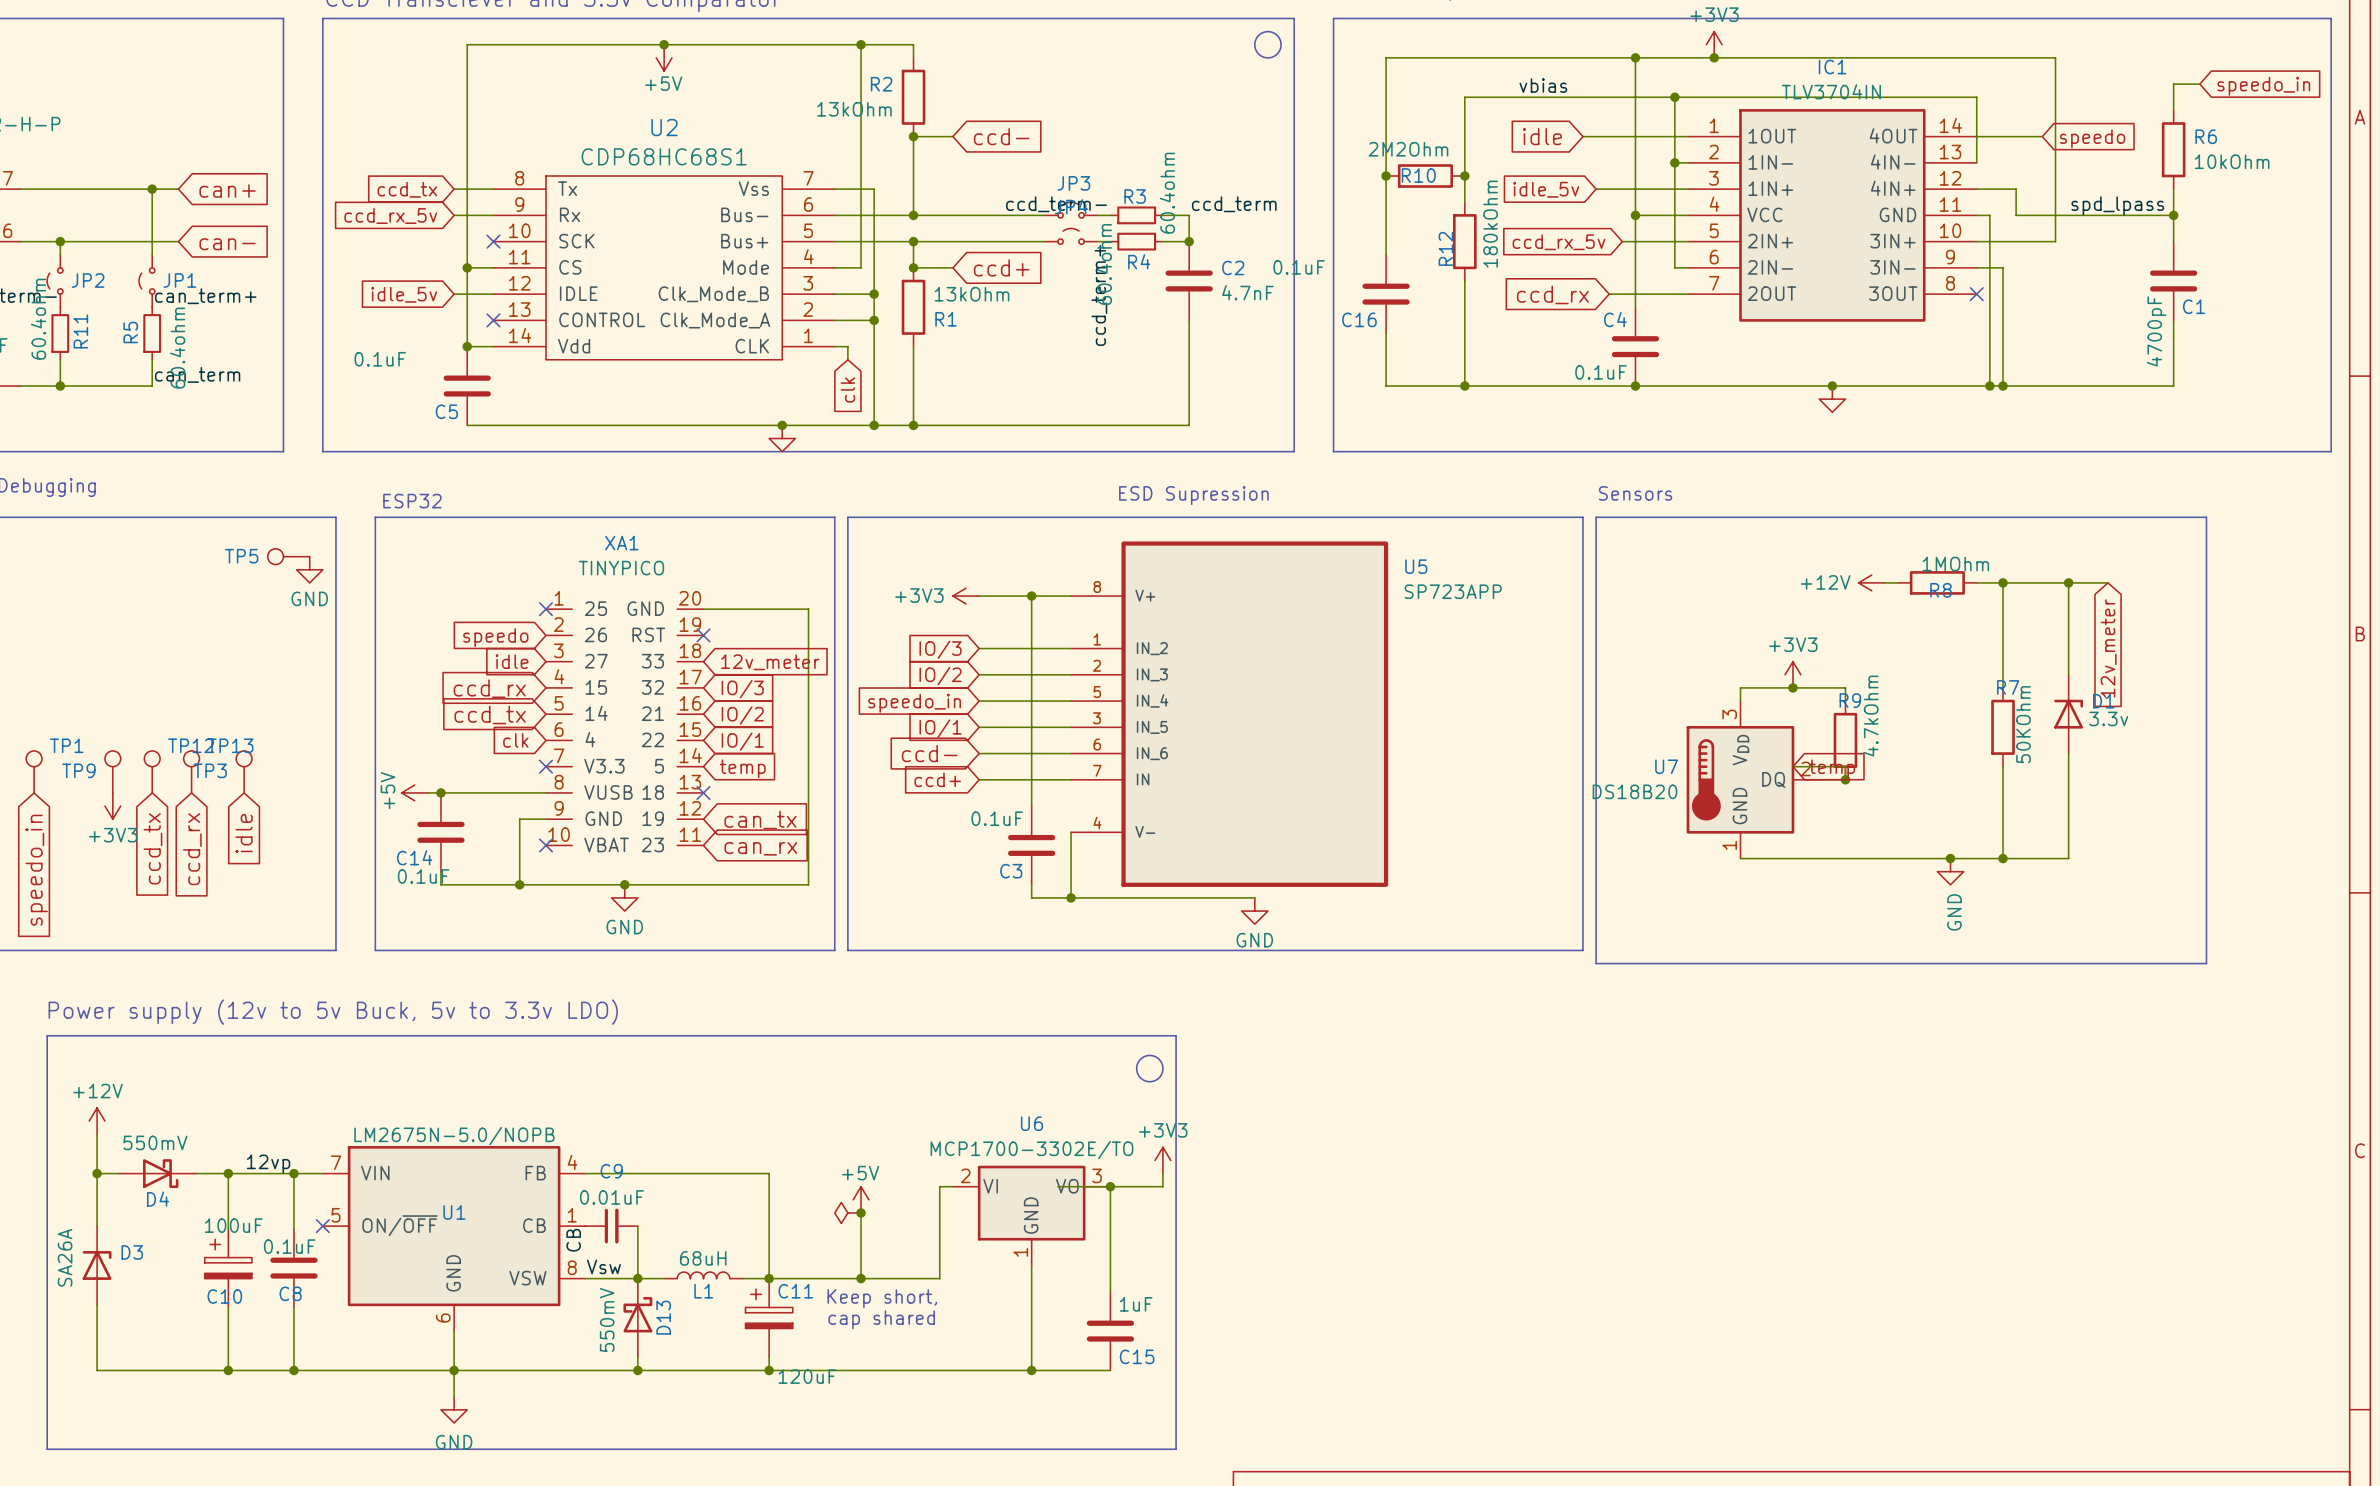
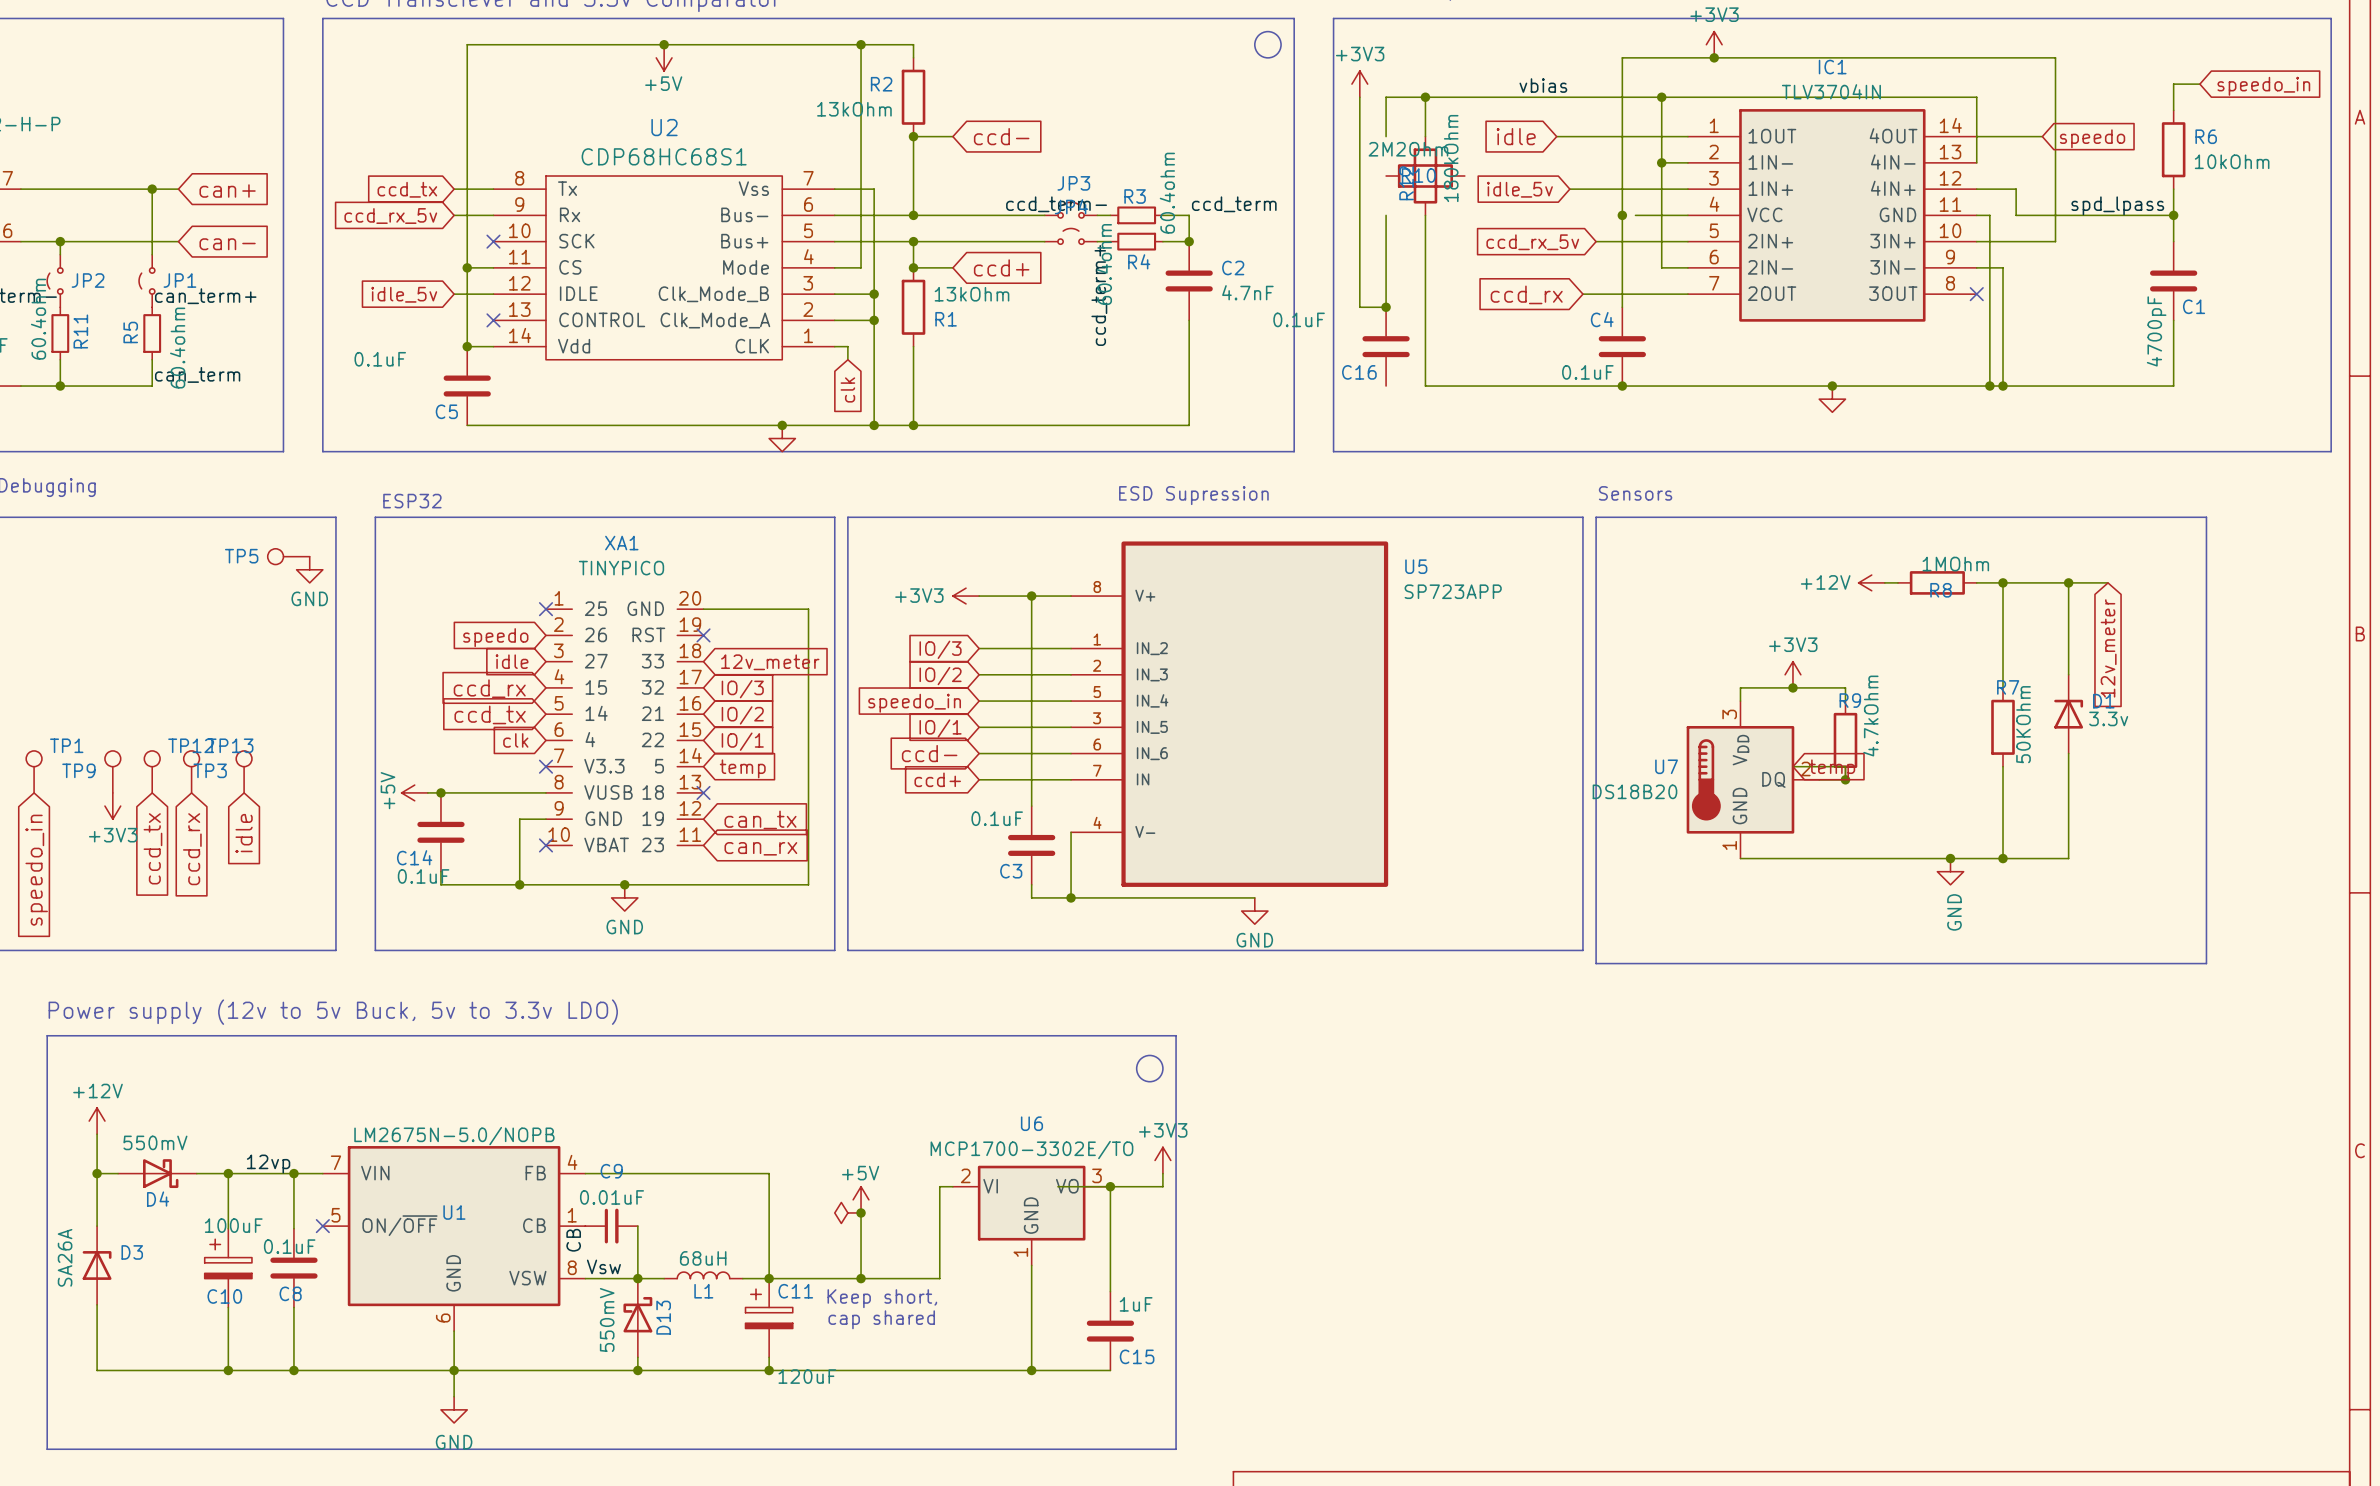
wire: (1622, 57) (1386, 57) (1386, 97) -> (1622, 57) (1622, 307)
wire: (1635, 57) (1635, 307) -> none
junction: (1635, 57) -> none
power symbol: none -> +3V3 (1359, 84)
wire: none -> (1359, 97) (1359, 307) (1386, 307) (1386, 254)
wire: none -> (1425, 97) (1425, 136)
junction: none -> (1425, 97)
wire: (1464, 97) (1464, 202) -> (1464, 97) (1386, 97)
wire: (1674, 97) (1674, 267) -> (1661, 97) (1661, 267) (1674, 267)
junction position: (1674, 97) -> (1661, 97)
wire: (1386, 136) (1386, 215) -> none
global label position: idle (1542, 136) -> idle (1516, 136)
wire: none -> (1556, 136) (1582, 136)
wire: none -> (1661, 162) (1674, 162)
junction position: (1674, 162) -> (1661, 162)
junction: (1386, 176) -> none
junction: (1464, 176) -> none
global label position: idle_5v (1546, 189) -> idle_5v (1519, 189)
wire: none -> (1569, 189) (1596, 189)
junction position: (1635, 215) -> (1622, 215)
R12 position: (1464, 241) -> (1425, 176)
wire: none -> (1596, 241) (1622, 241)
global label position: ccd_rx_5v (1559, 242) -> ccd_rx_5v (1532, 242)
wire: (1464, 281) (1464, 386) -> none
C16 position: (1386, 294) -> (1386, 346)
global label position: ccd_rx (1552, 294) -> ccd_rx (1526, 294)
wire: none -> (1582, 294) (1609, 294)
junction: none -> (1386, 307)
wire: (1386, 333) (1386, 386) (1425, 386) -> (1425, 215) (1425, 386)
C4 position: (1635, 346) -> (1622, 346)
junction: (1464, 386) -> none
junction position: (1635, 386) -> (1622, 386)

